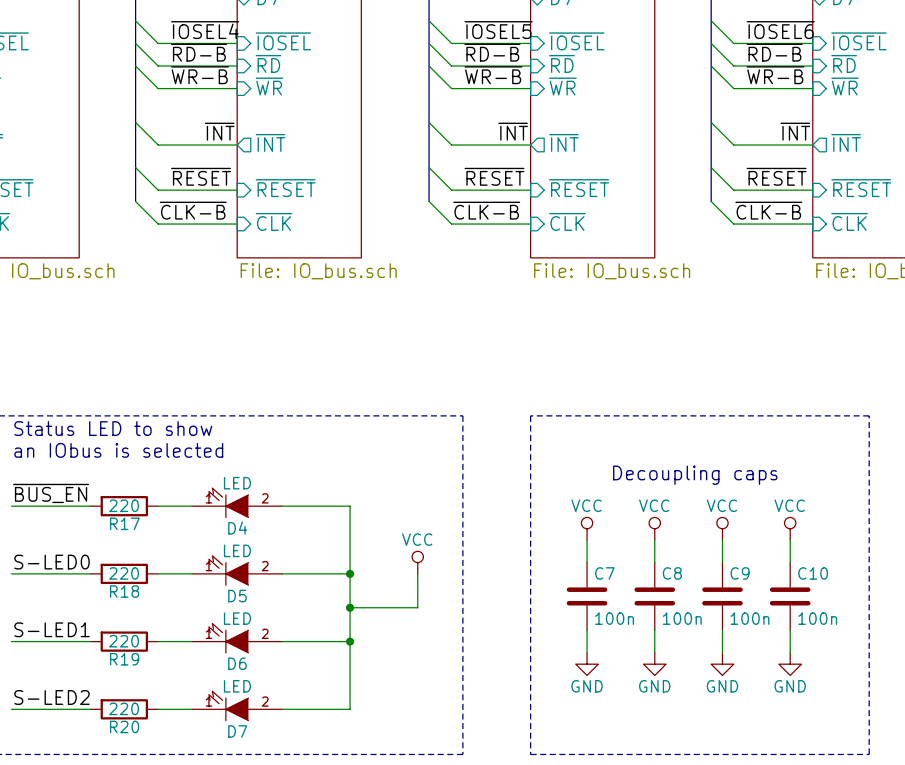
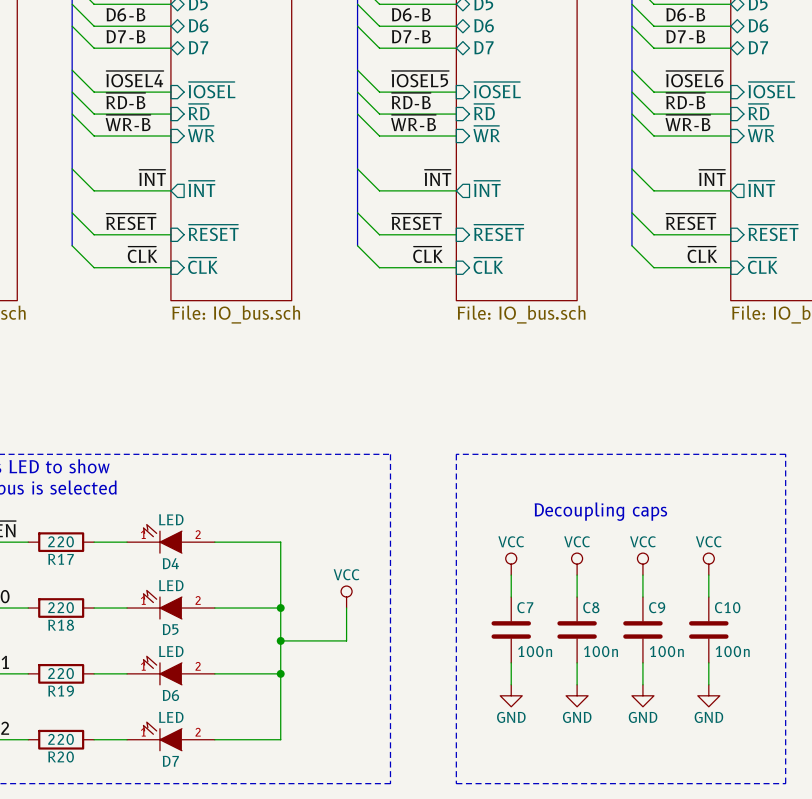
label: ~{CLK-B} (193, 210) -> ~{CLK} (142, 254)
label: ~{CLK-B} (486, 210) -> ~{CLK} (427, 254)
label: ~{CLK-B} (768, 210) -> ~{CLK} (702, 254)

